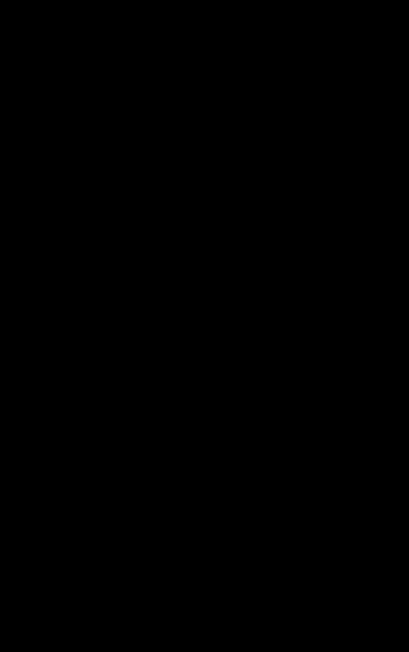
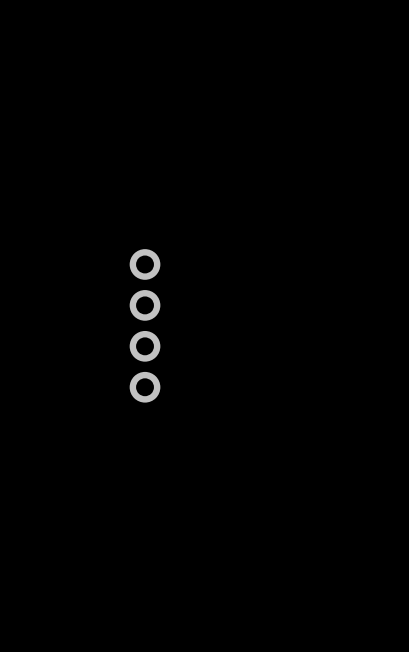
via: none -> (145, 264)
via: none -> (145, 305)
via: none -> (145, 346)
via: none -> (145, 387)

